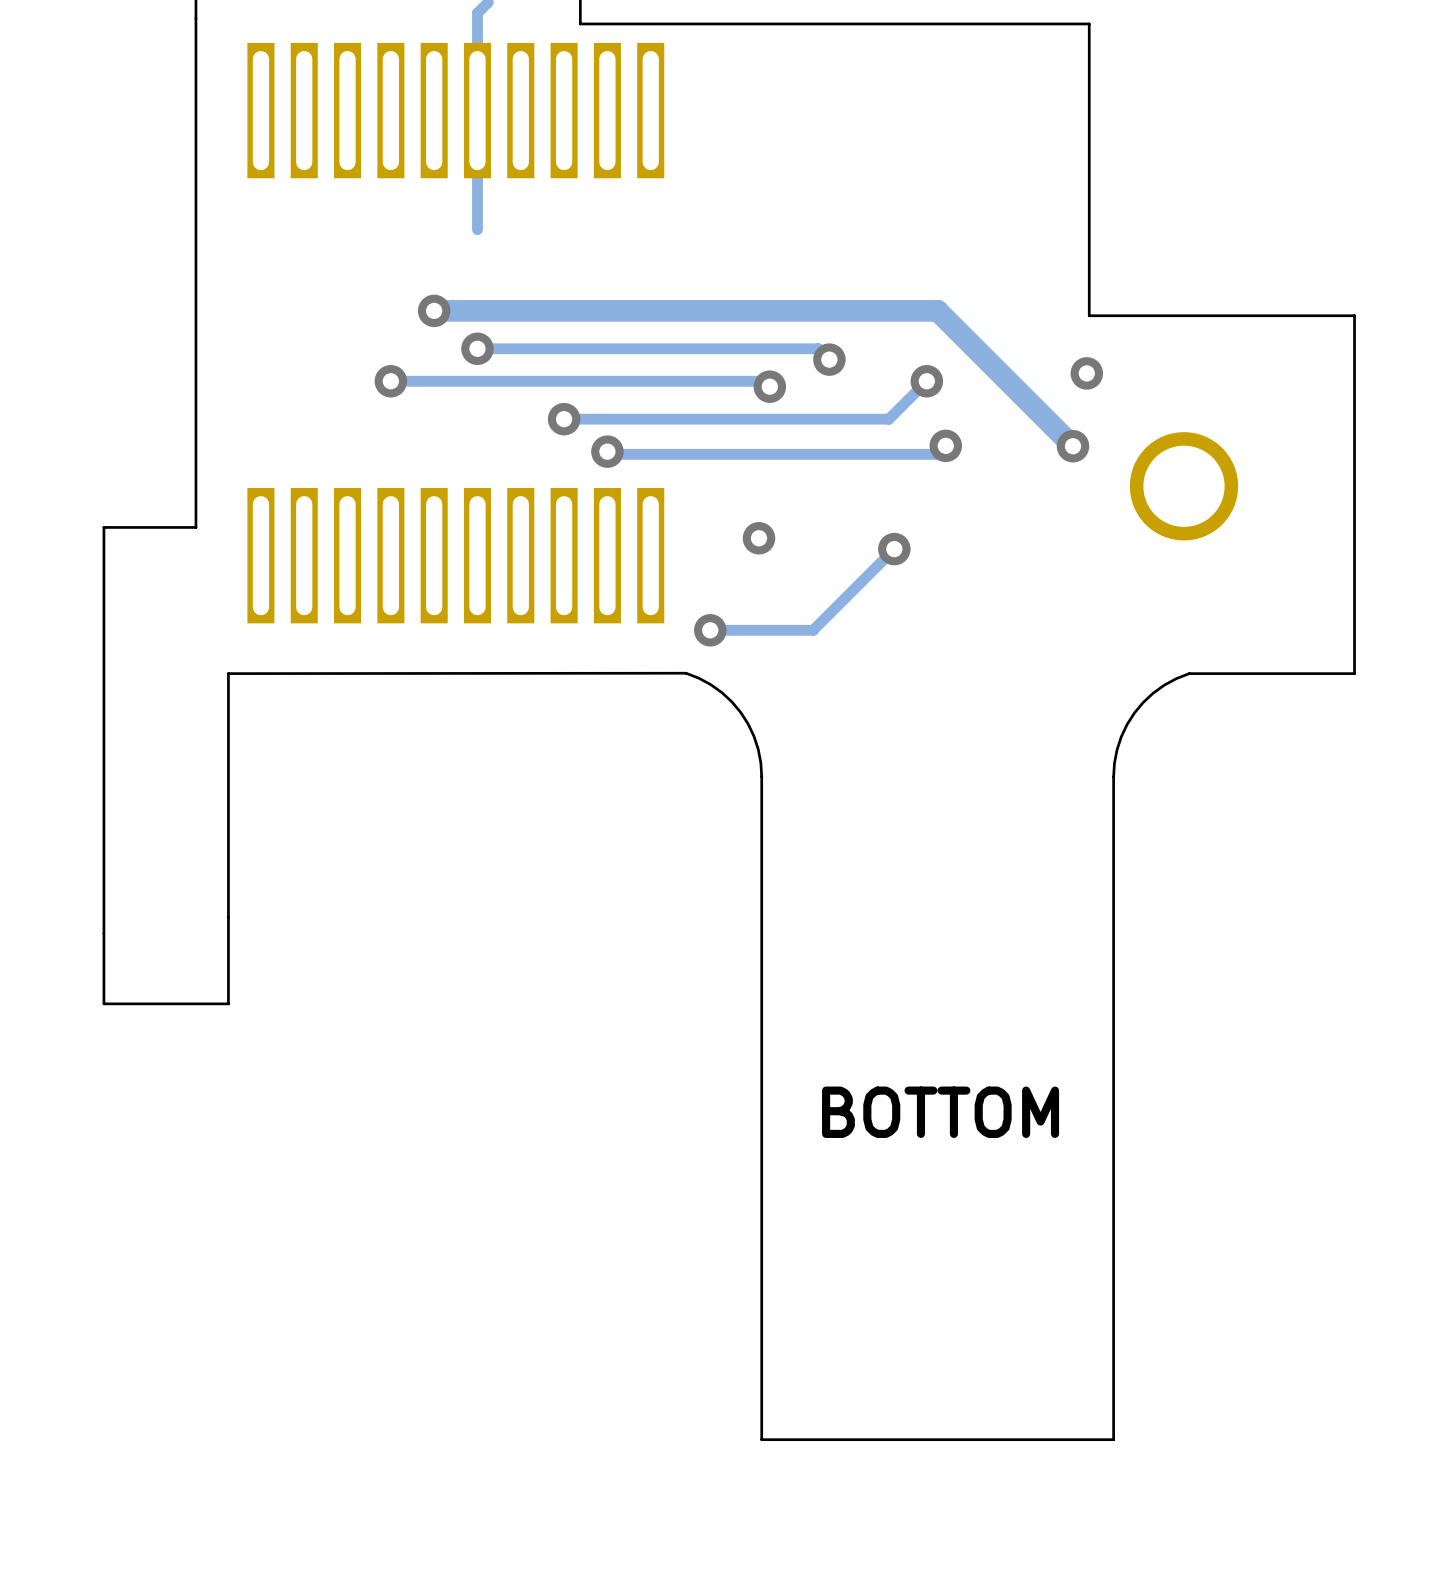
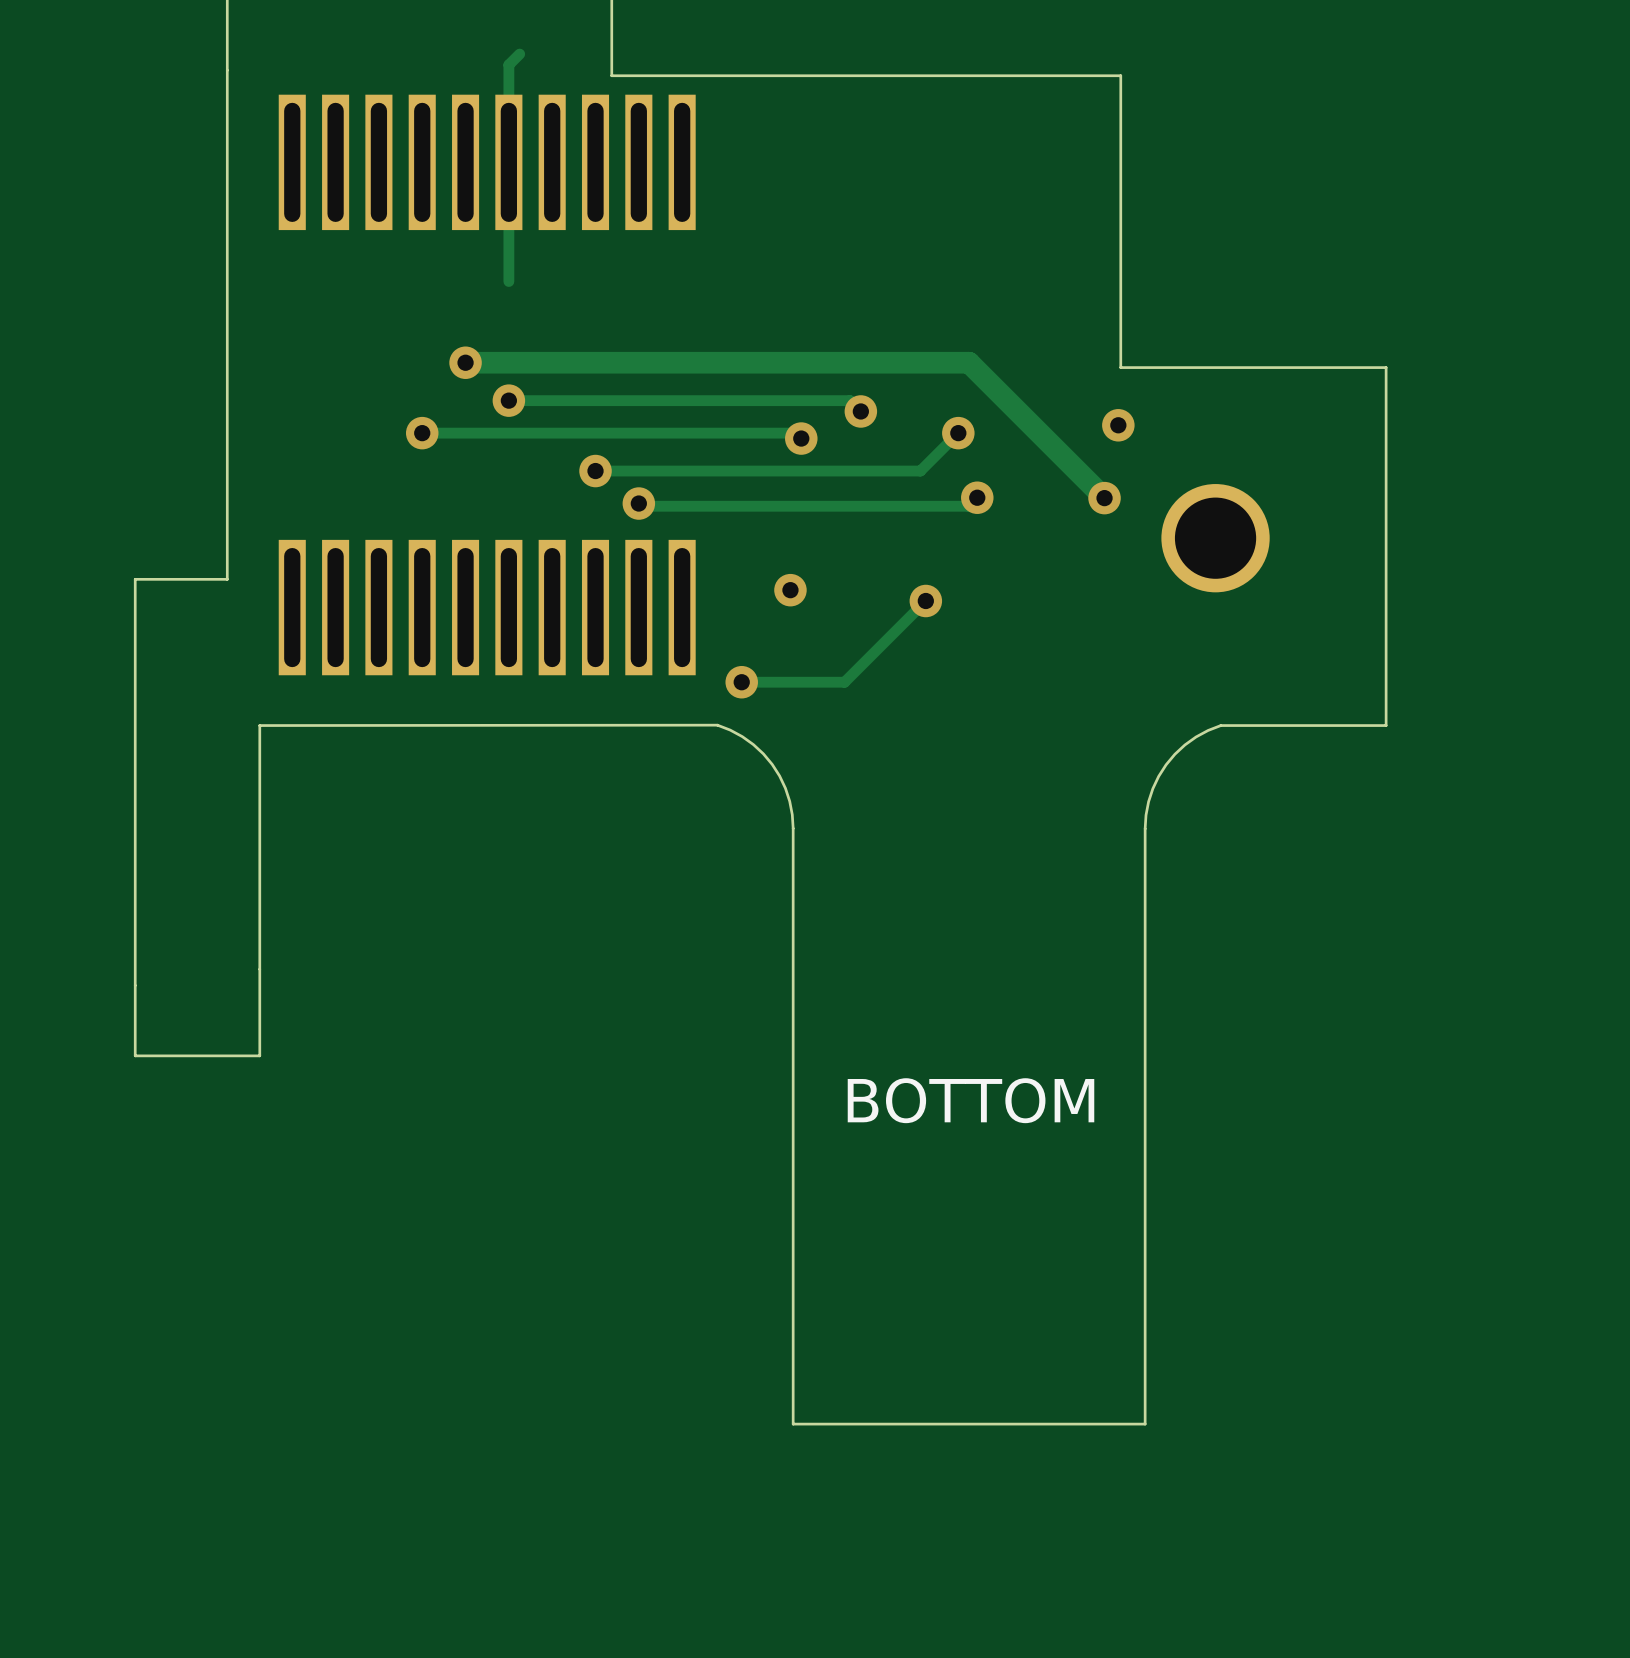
text position: BOTTOM (940, 1112) -> BOTTOM (970, 1100)
board edge: (1113, 1372) (1113, 1439) (761, 1439) (761, 1372) -> (1145, 1424) (793, 1424)

